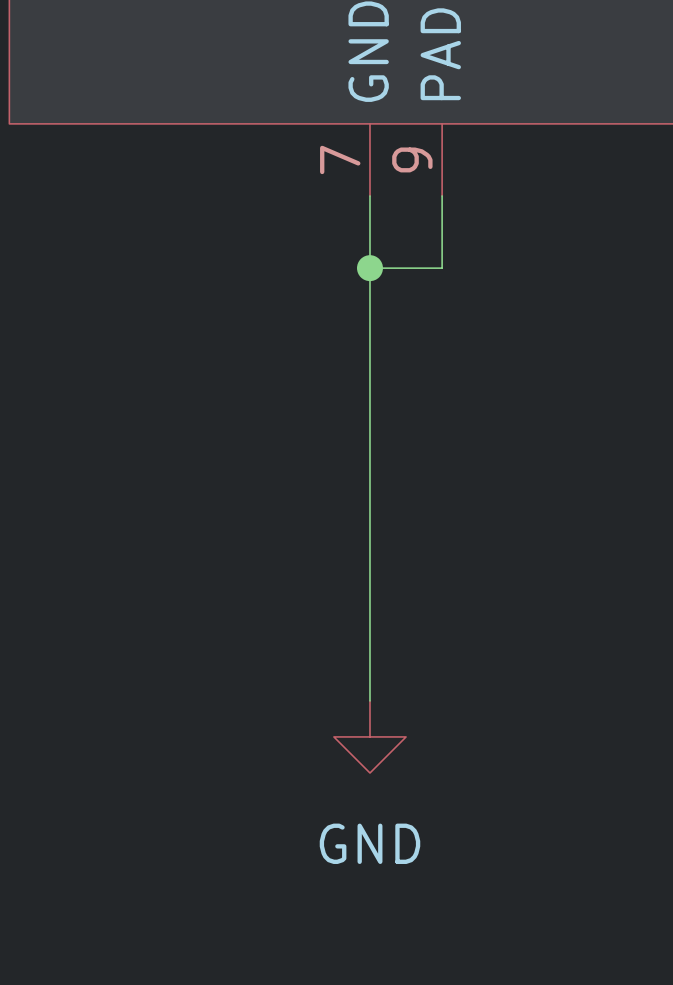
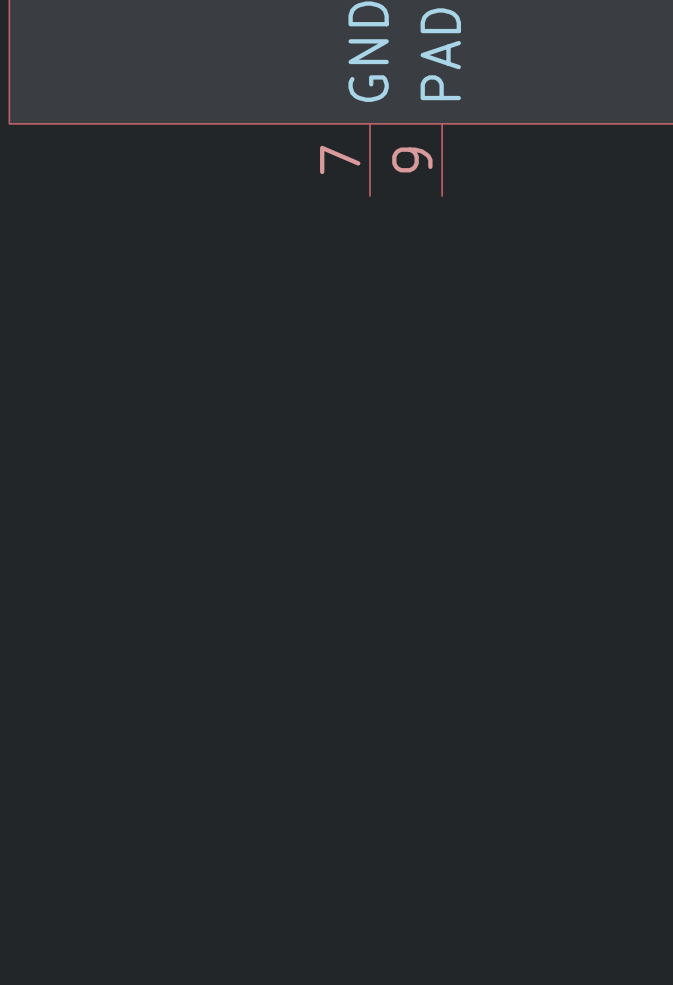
wire: (369, 196) (369, 700) -> none
wire: (442, 196) (442, 268) (369, 268) -> none
junction: (369, 268) -> none
power symbol: GND (369, 736) -> none

